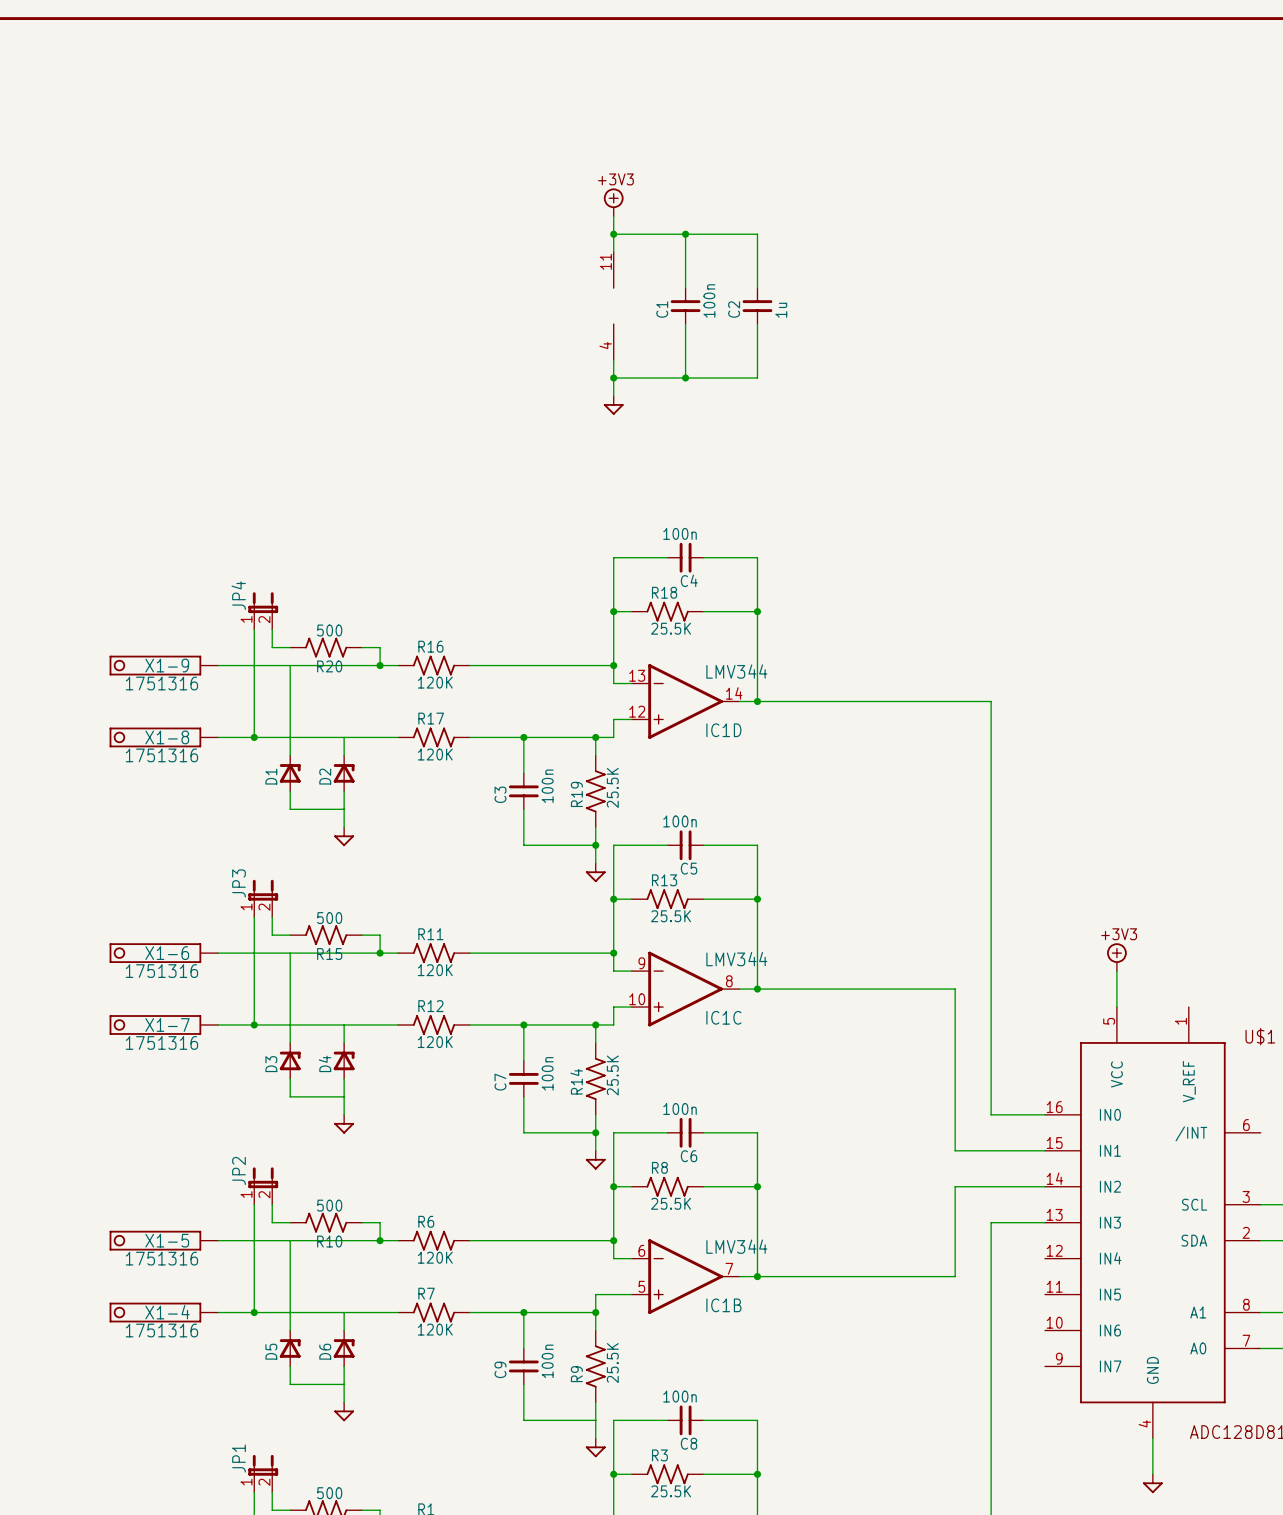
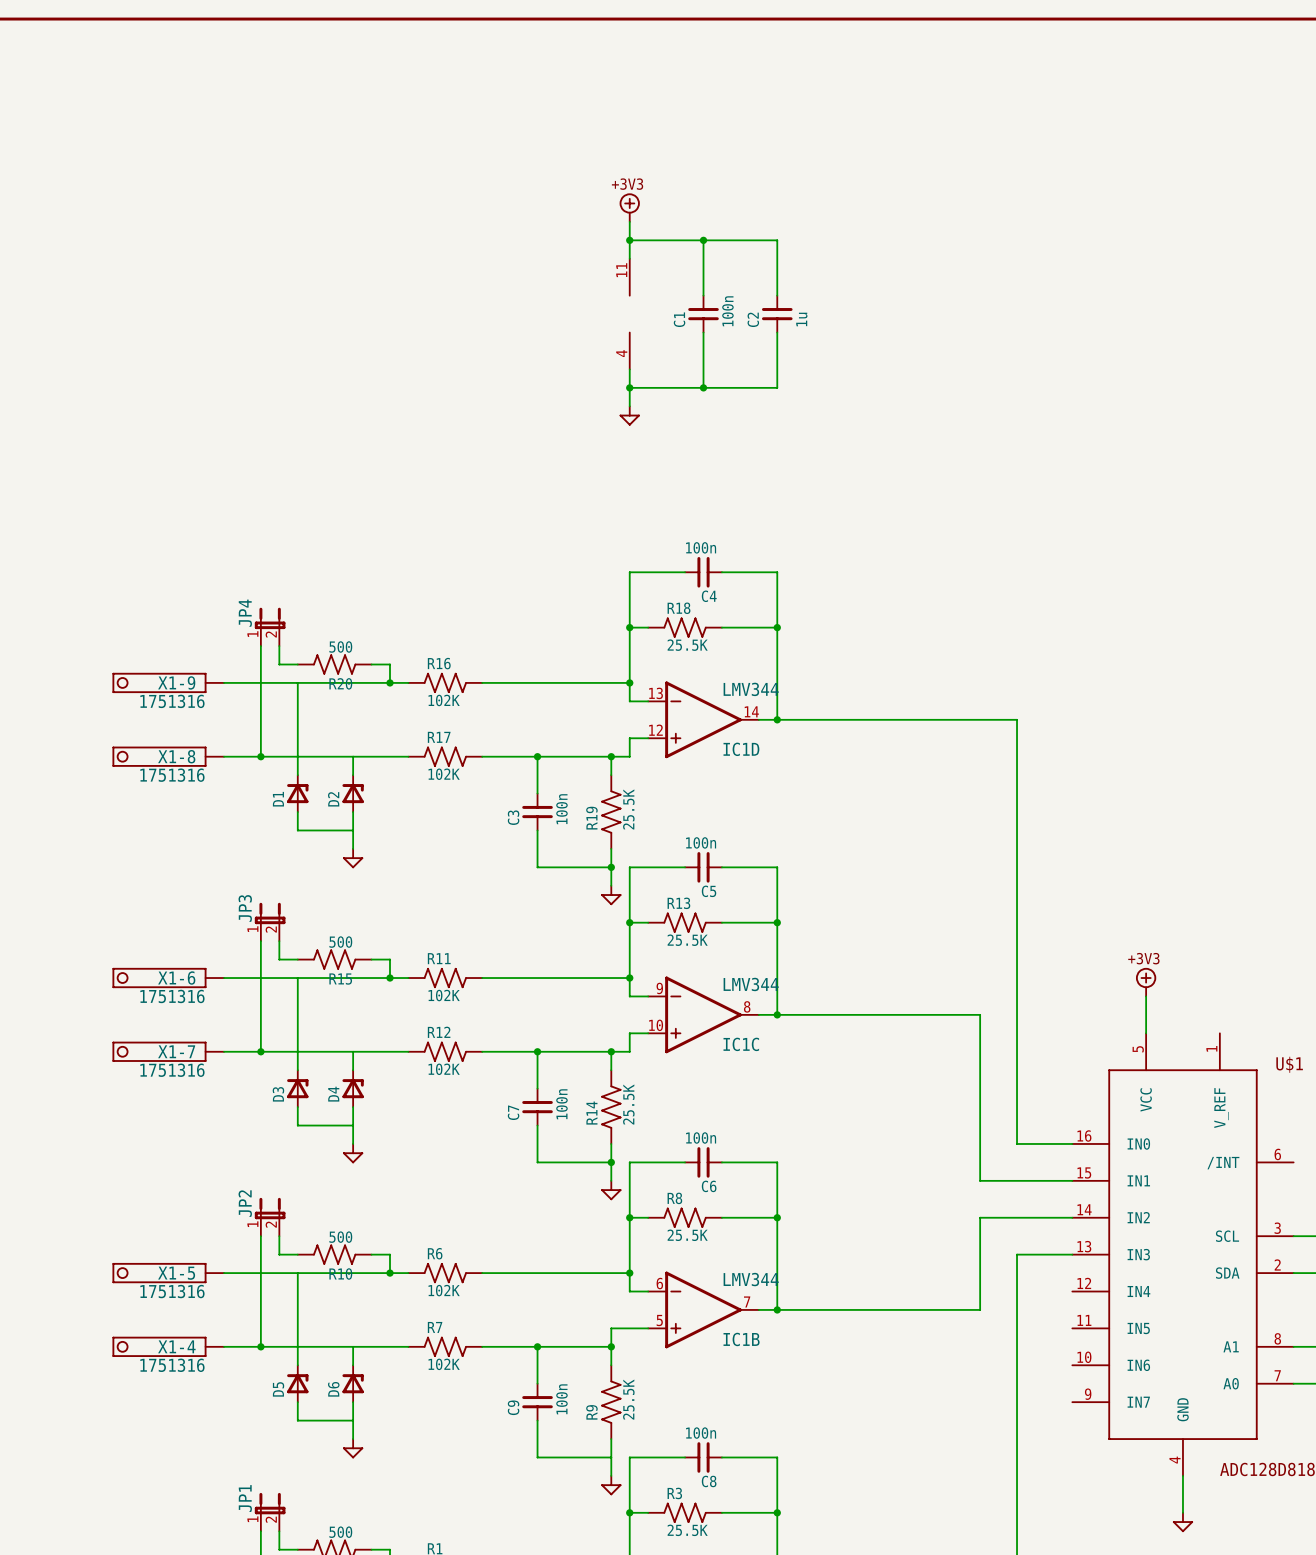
R16 value: 120K (435, 682) -> 102K (444, 700)
R17 value: 120K (435, 754) -> 102K (444, 774)
R11 value: 120K (435, 970) -> 102K (444, 995)
R12 value: 120K (435, 1042) -> 102K (444, 1069)
R6 value: 120K (435, 1257) -> 102K (444, 1290)
R7 value: 120K (435, 1329) -> 102K (444, 1364)

